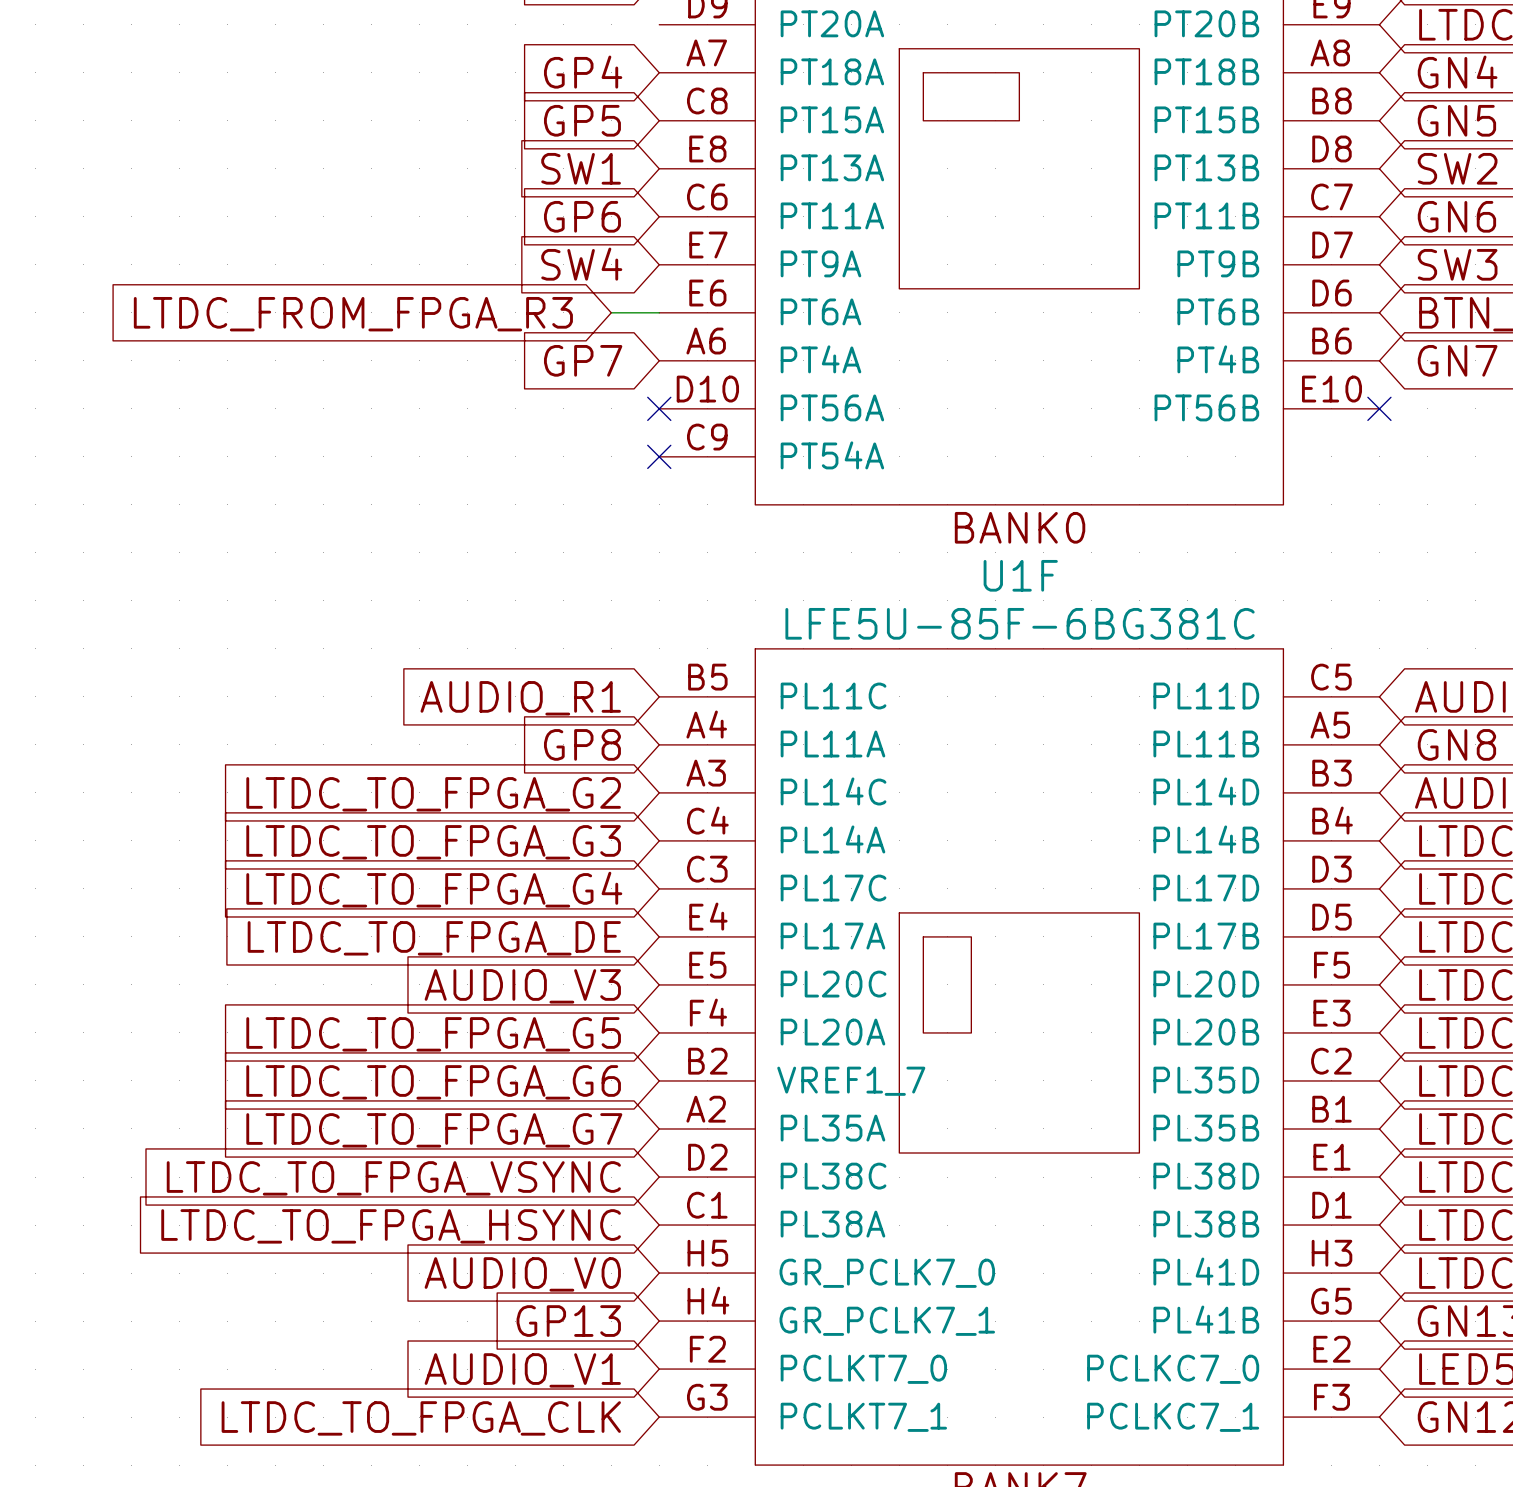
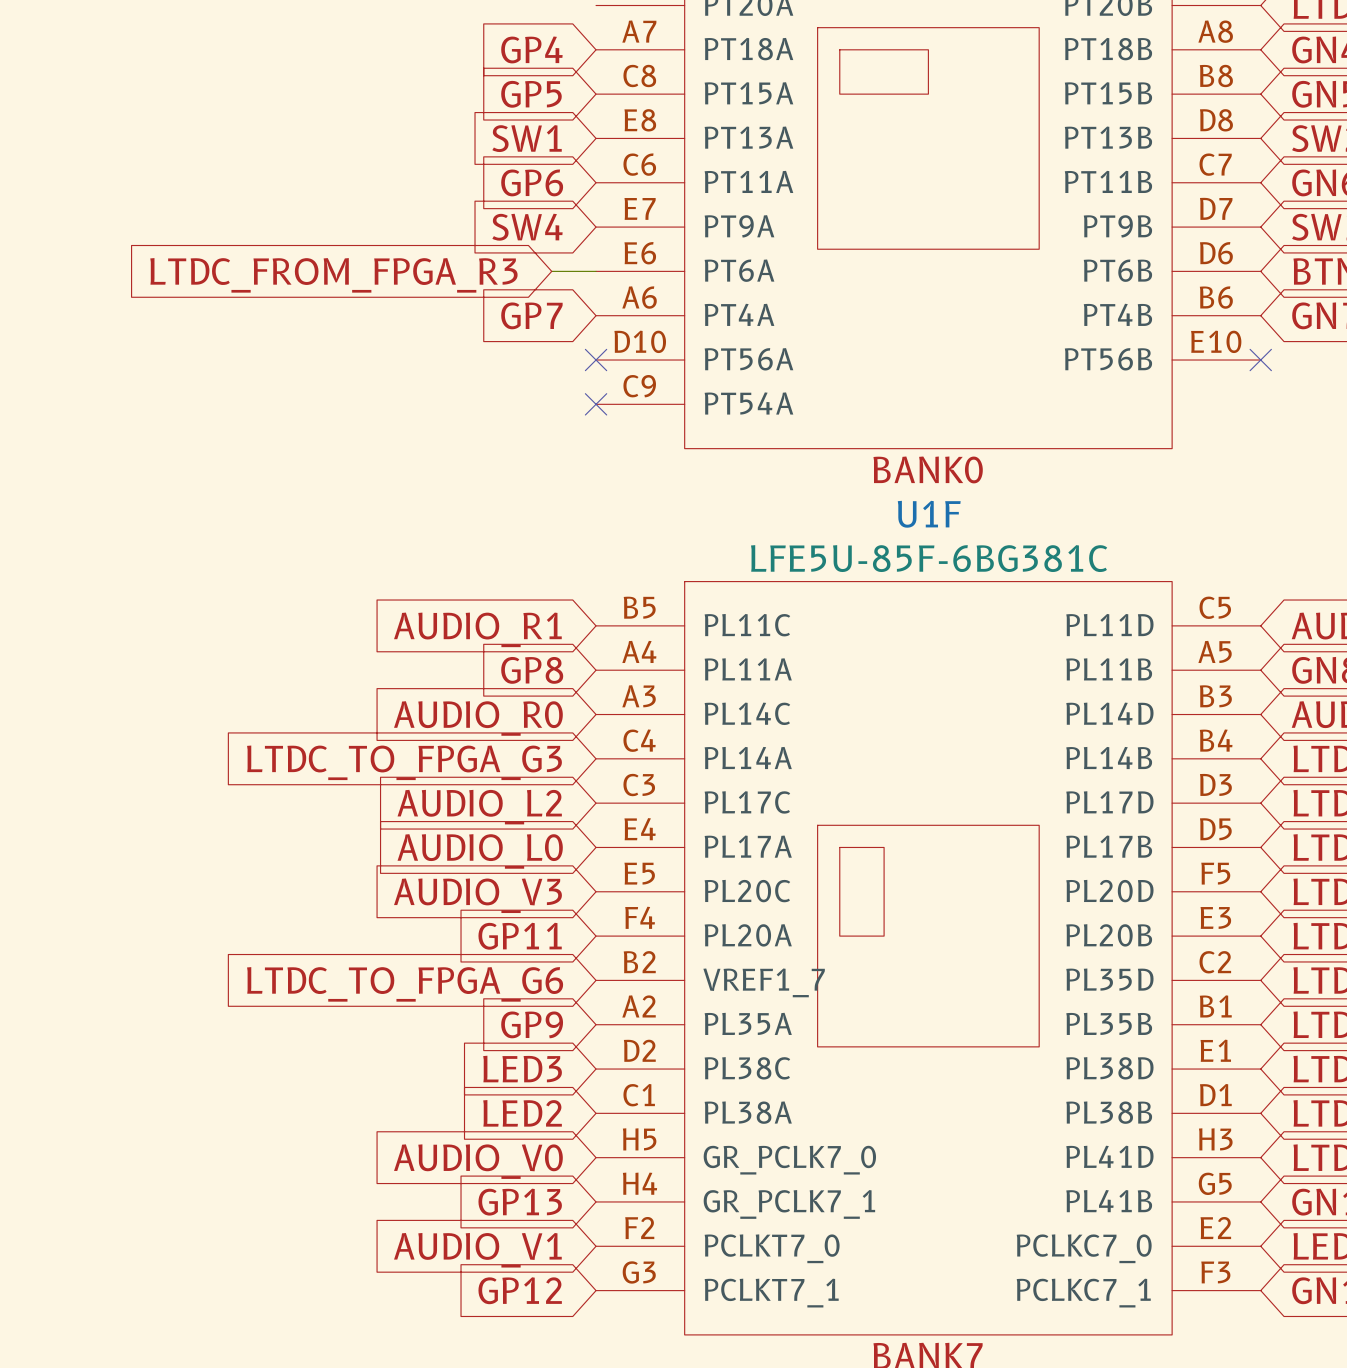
global label: LTDC_TO_FPGA_G2 (433, 794) -> AUDIO_R0 (478, 718)
global label: LTDC_TO_FPGA_G4 (434, 889) -> AUDIO_L2 (479, 807)
global label: LTDC_TO_FPGA_DE (434, 938) -> AUDIO_L0 (480, 851)
global label: LTDC_TO_FPGA_G5 (433, 1034) -> GP11 (520, 936)
global label: LTDC_TO_FPGA_G7 (434, 1130) -> GP9 (532, 1024)
global label: LTDC_TO_FPGA_VSYNC (393, 1178) -> LED3 (522, 1069)
global label: LTDC_TO_FPGA_HSYNC (391, 1226) -> LED2 (522, 1113)
global label: LTDC_TO_FPGA_CLK (421, 1418) -> GP12 (520, 1290)

